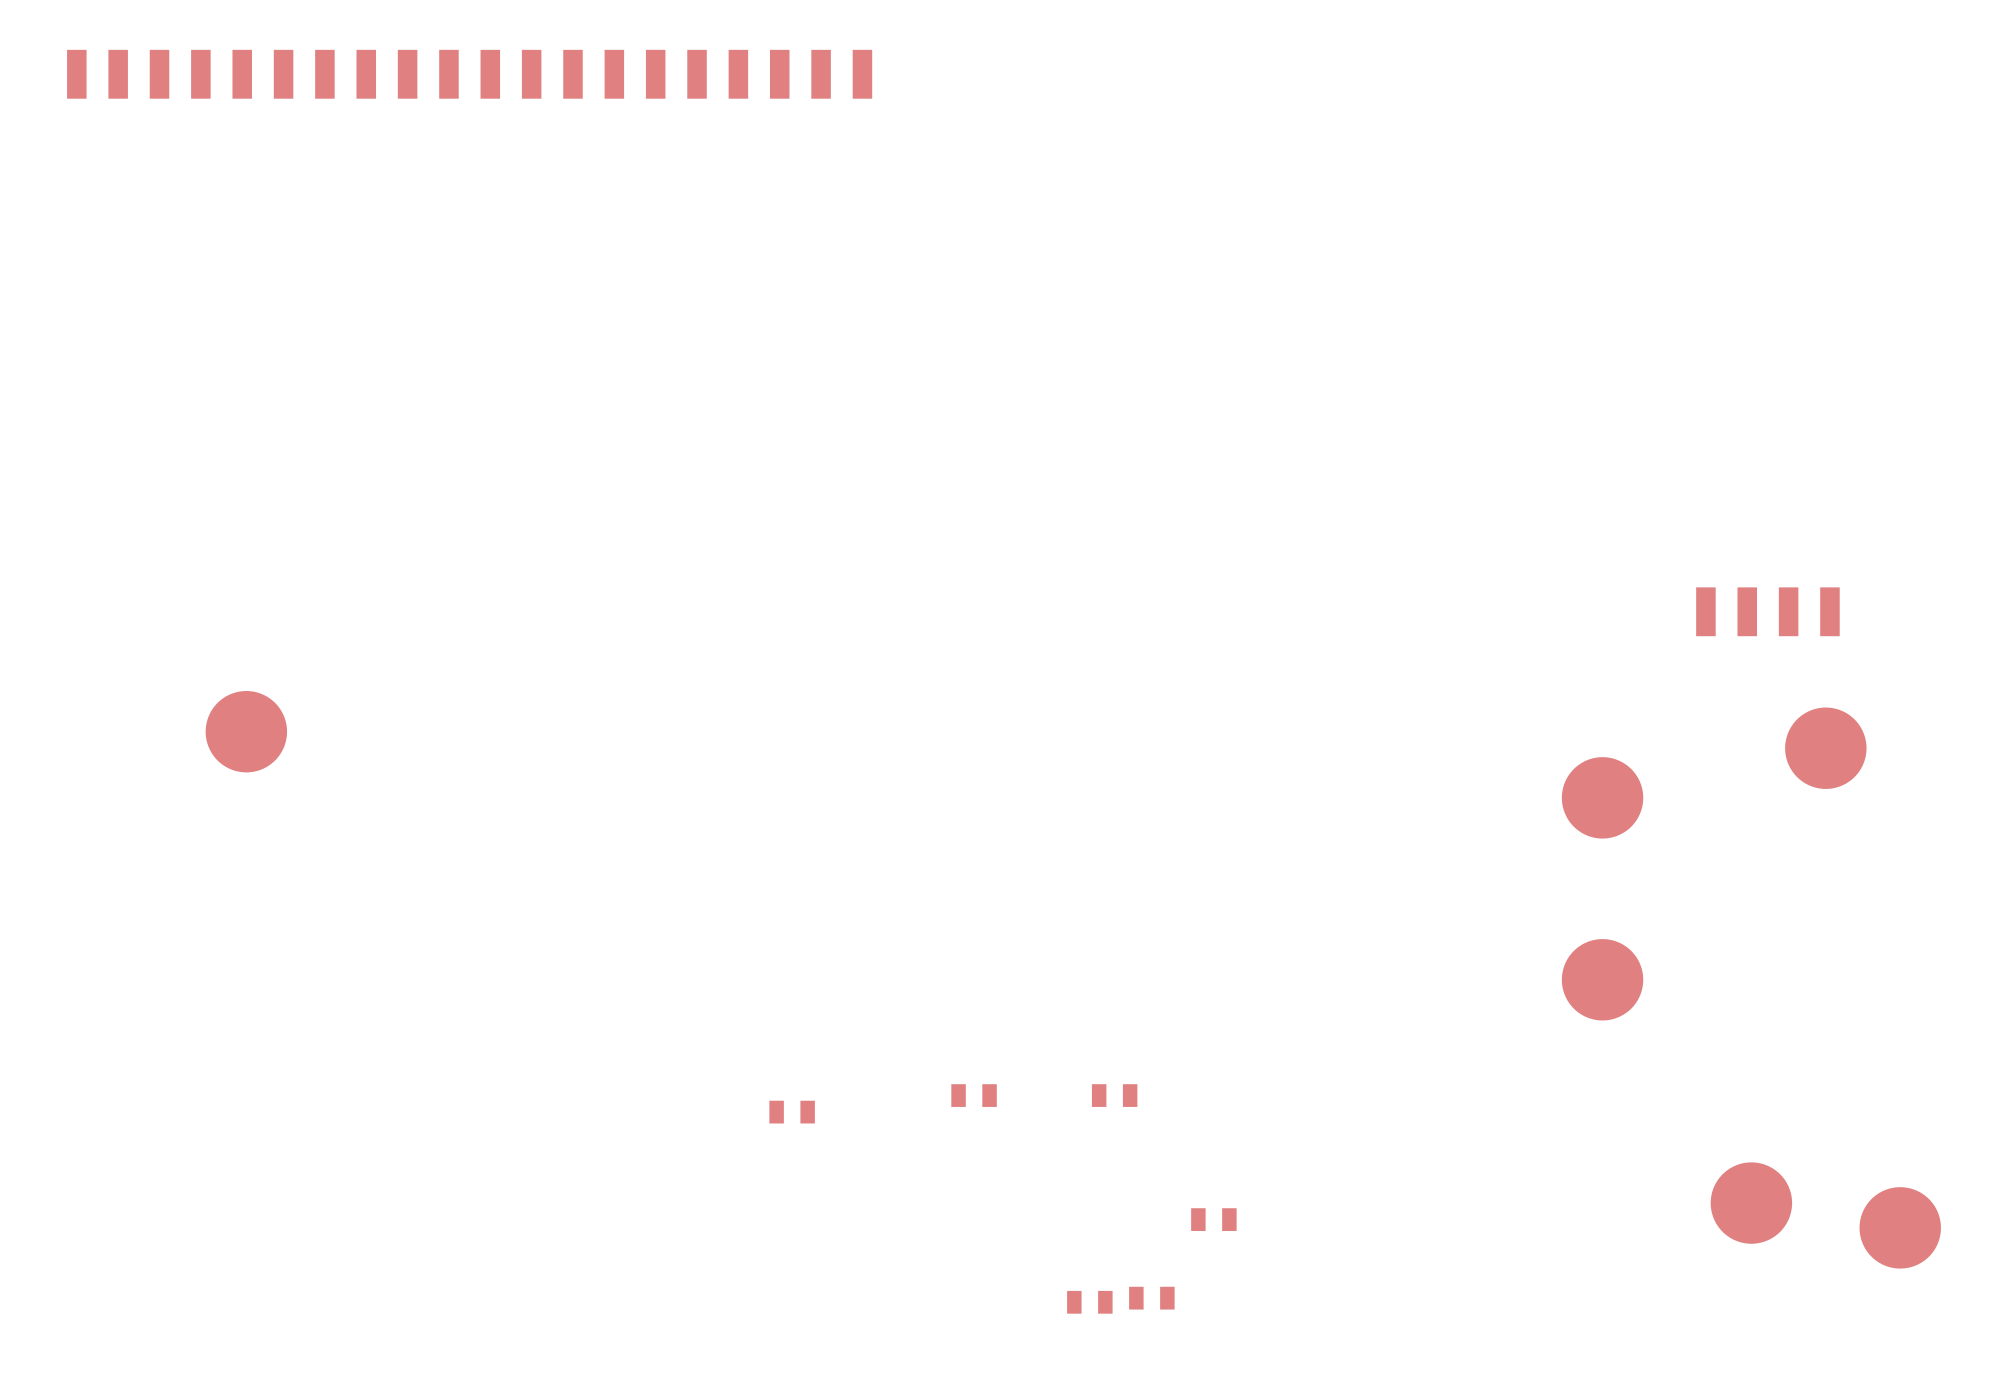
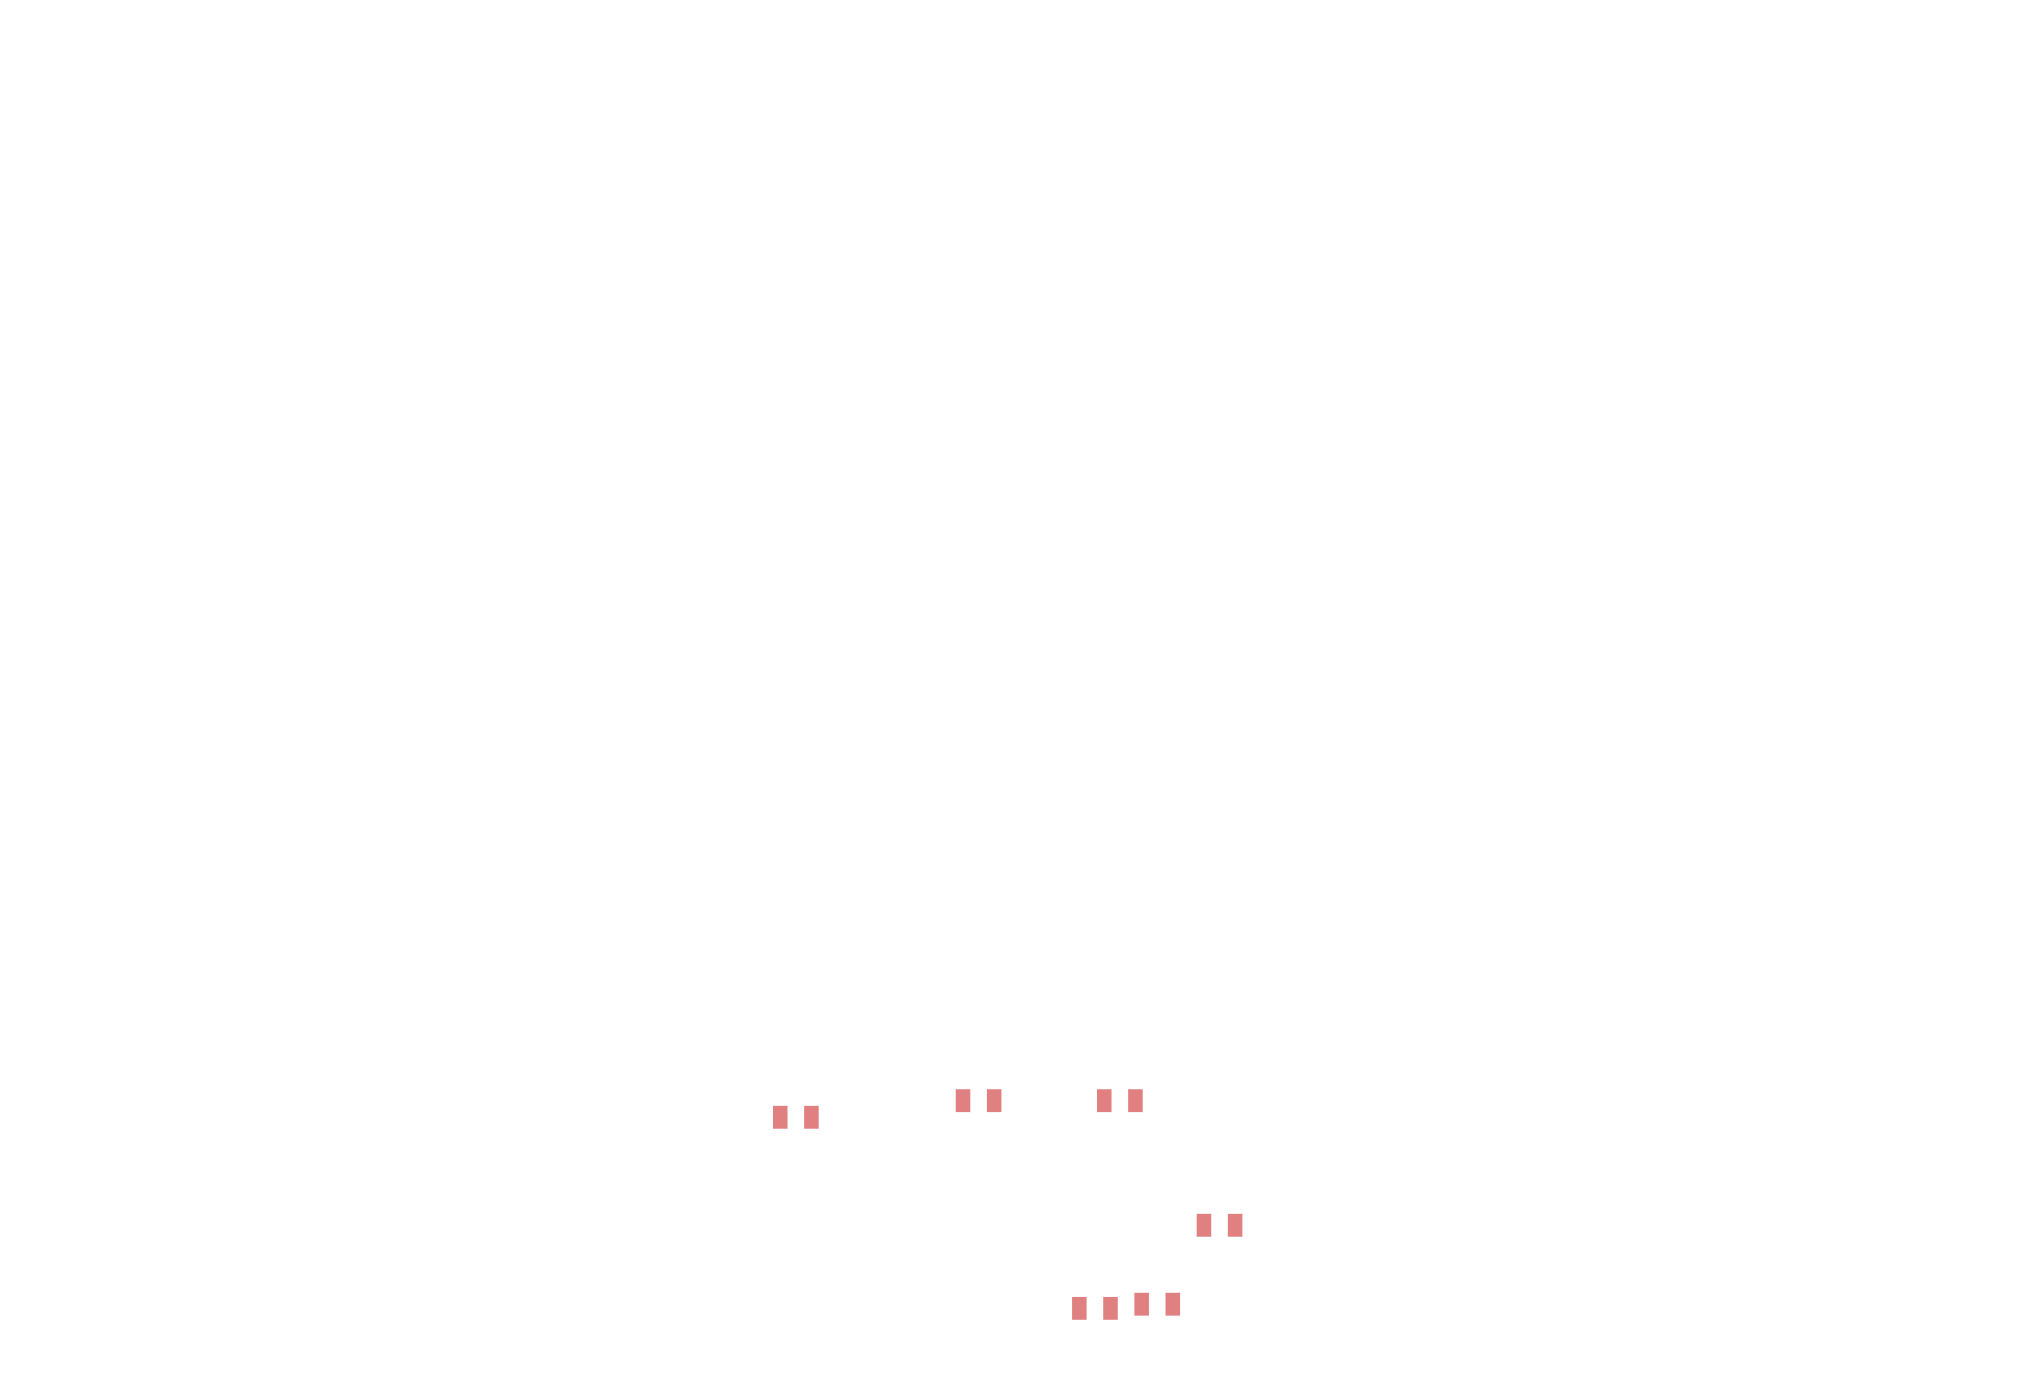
part: (469, 74) -> none
part: (1767, 611) -> none
part: (246, 731) -> none
part: (1825, 748) -> none
part: (1602, 797) -> none
part: (1602, 979) -> none
part: (1751, 1203) -> none
part: (1900, 1227) -> none

